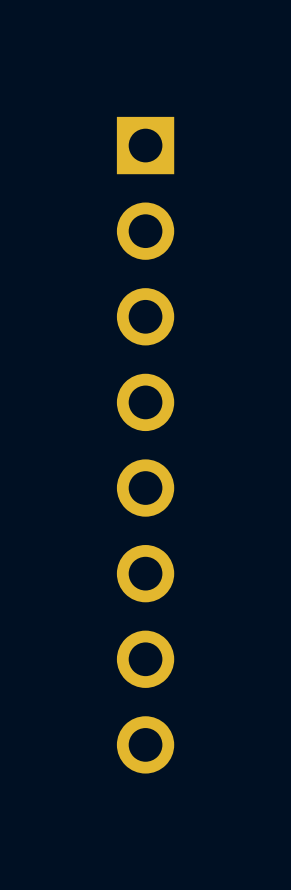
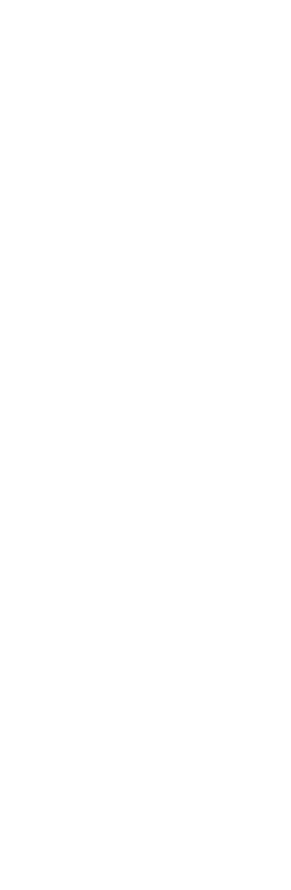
part: (145, 445) -> none

